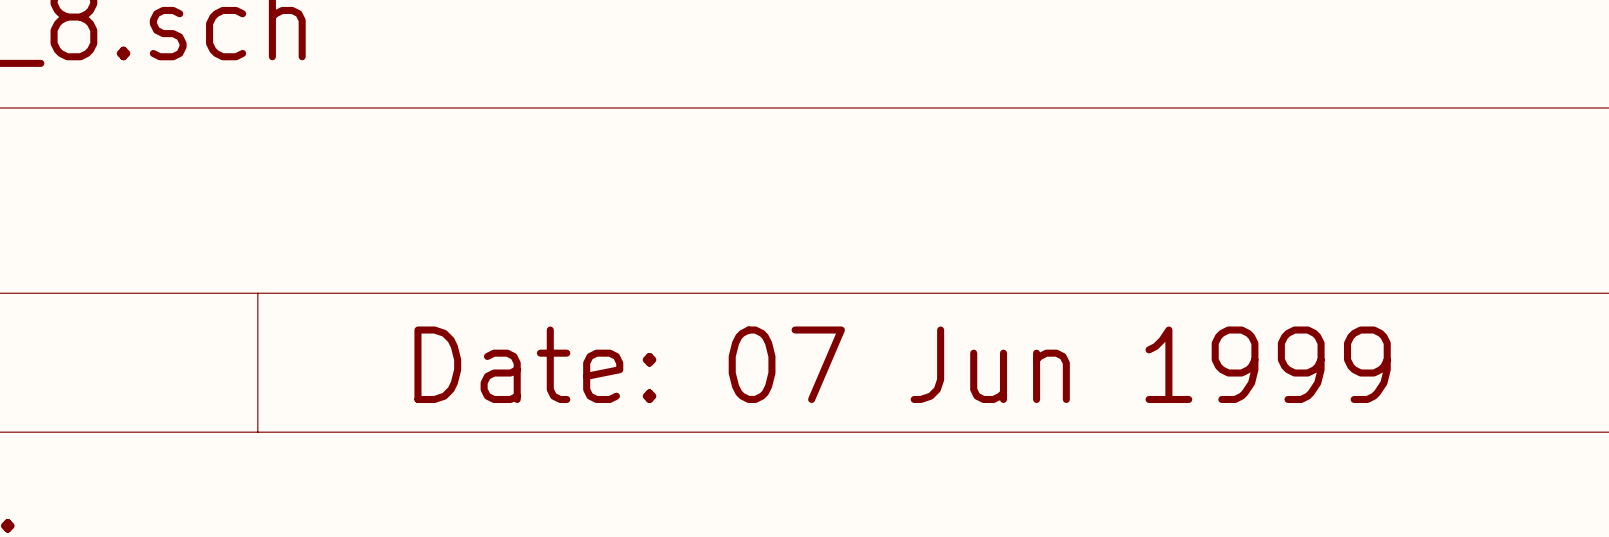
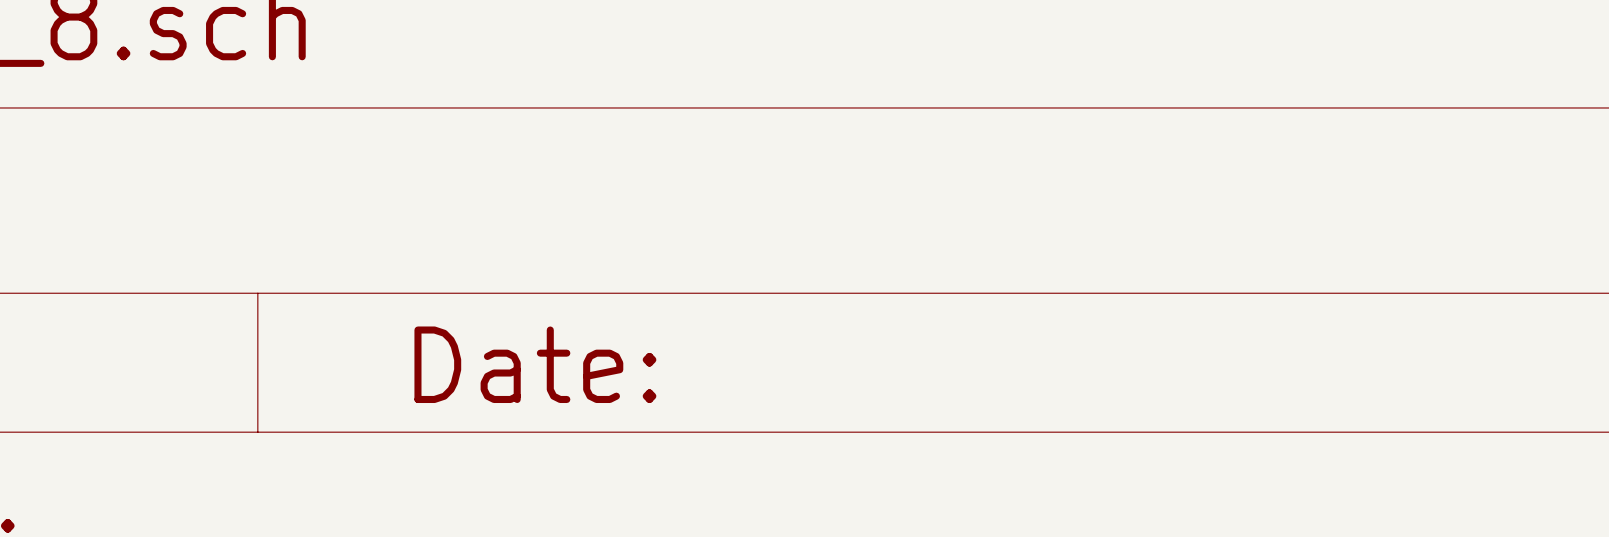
title block: Date: 07 Jun 1999 (902, 364) -> Date: (535, 364)

